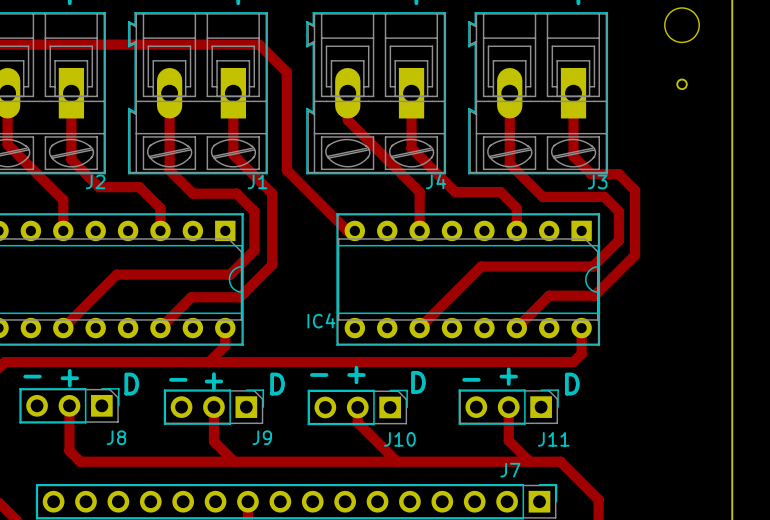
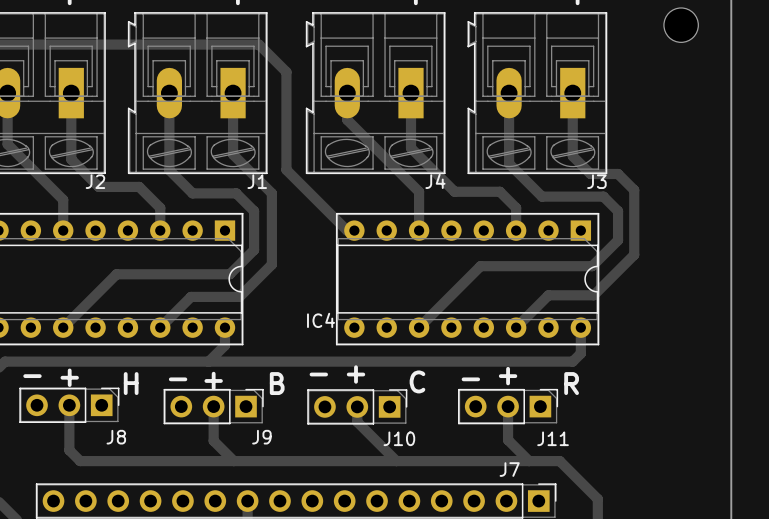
part: (682, 84) -> none
text: D (418, 382) -> C (417, 381)
text: D (131, 384) -> H (131, 383)
text: D (277, 384) -> B (277, 383)
text: D (572, 384) -> R (571, 383)

